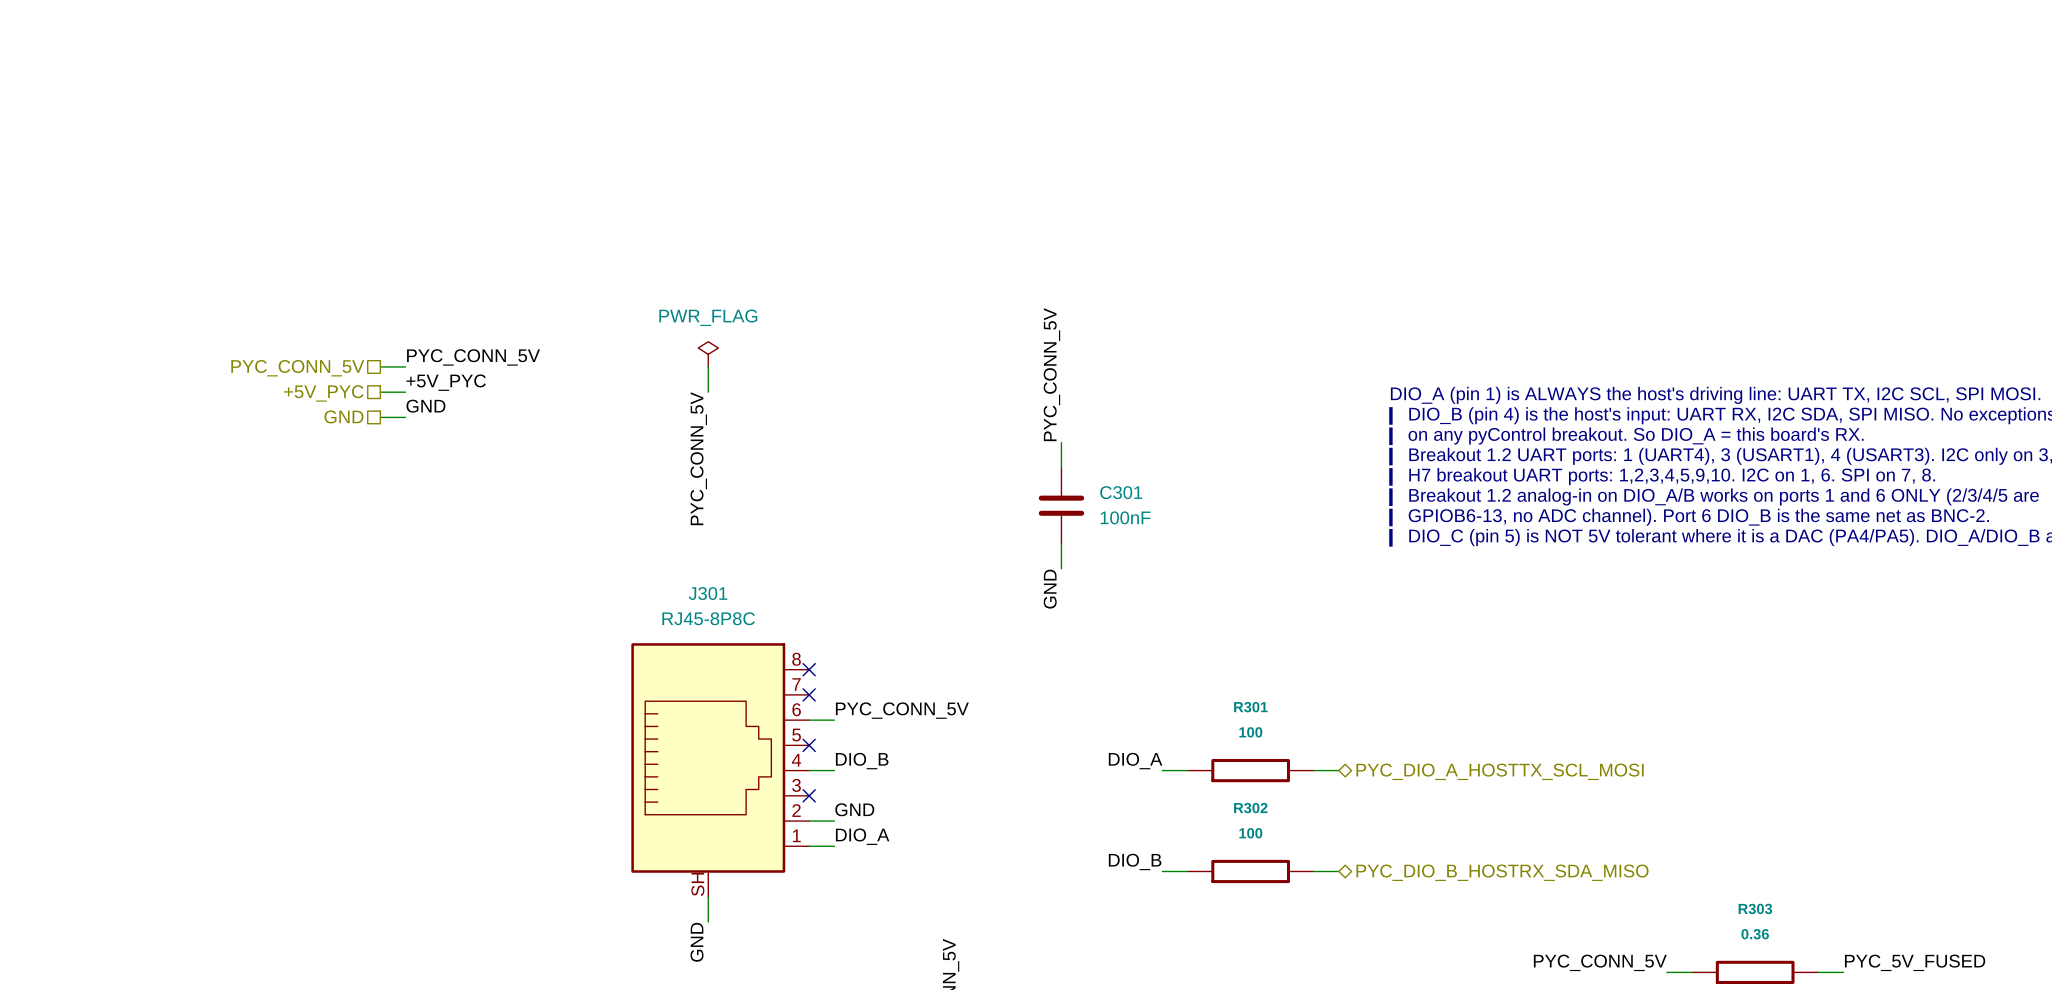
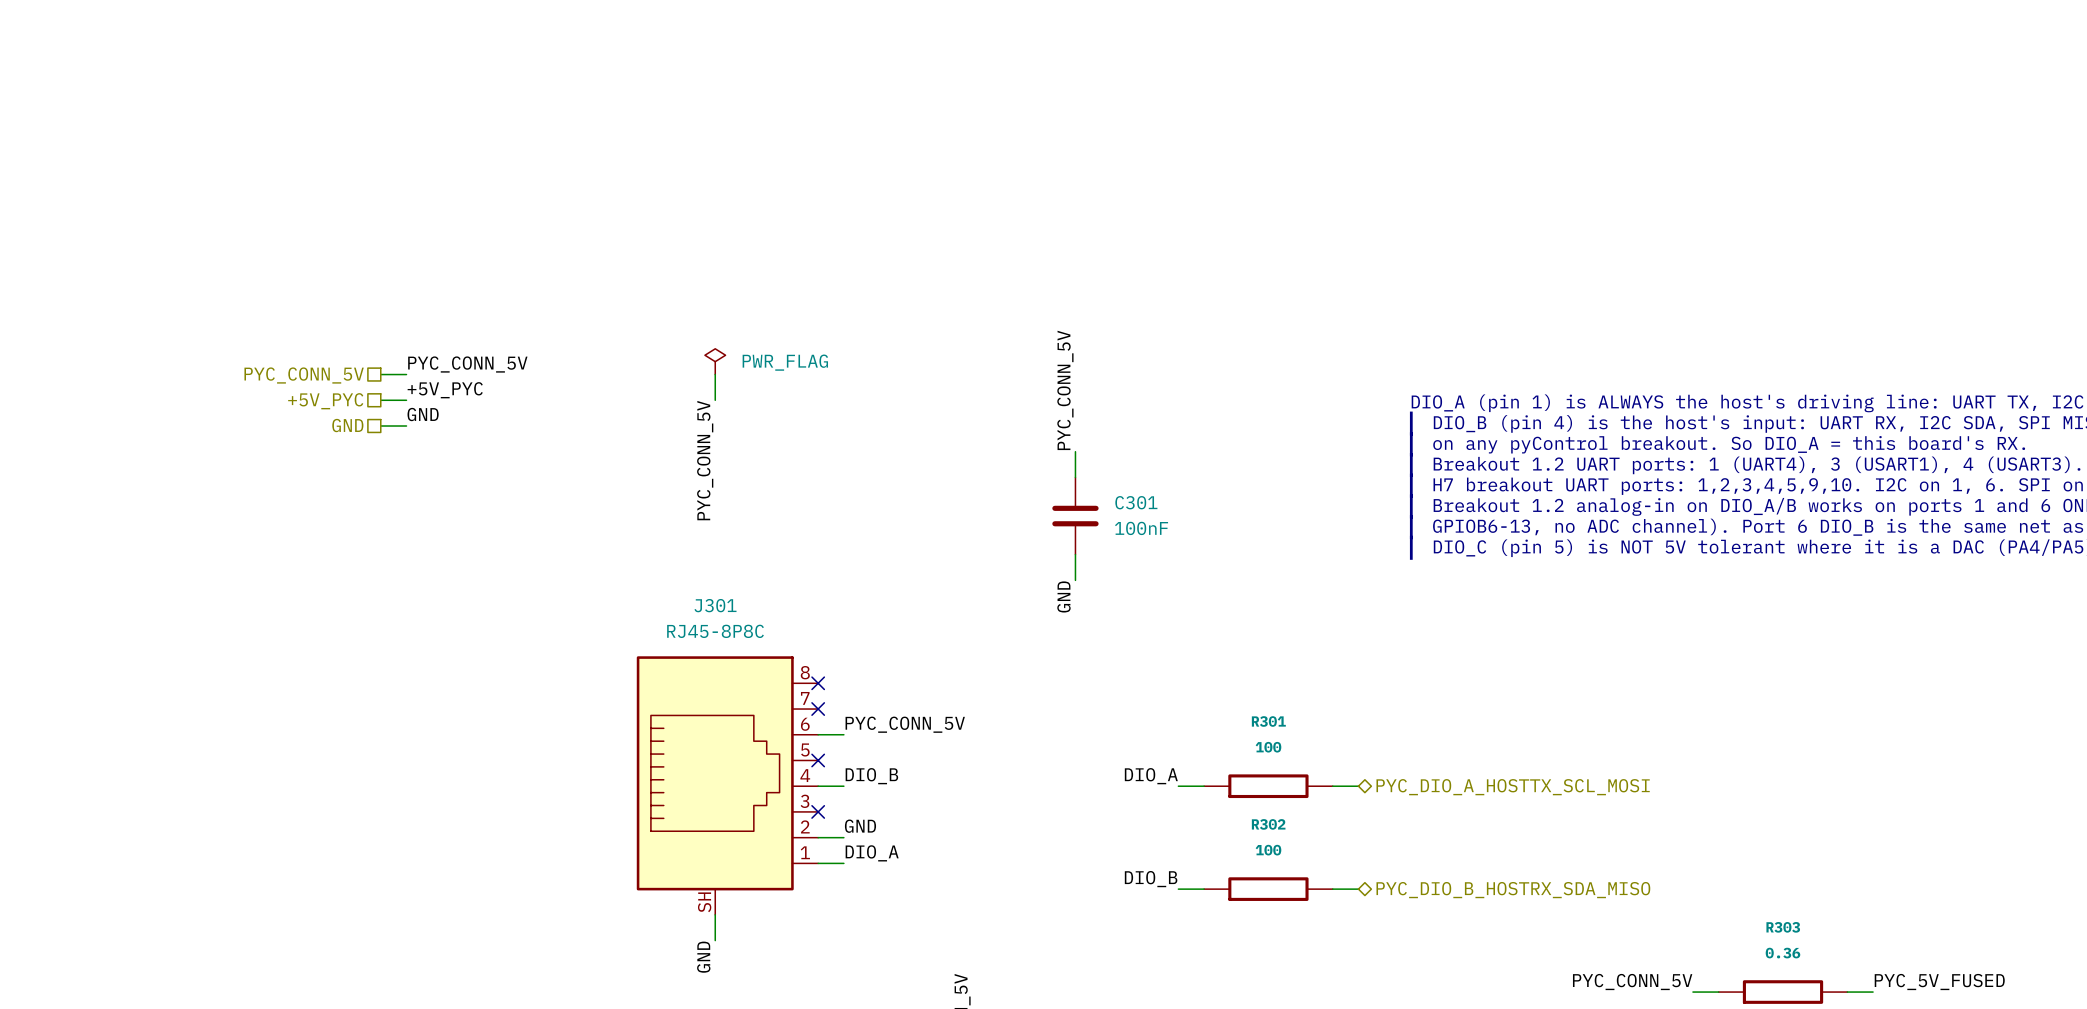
power symbol text position: PWR_FLAG (708, 317) -> PWR_FLAG (785, 362)

